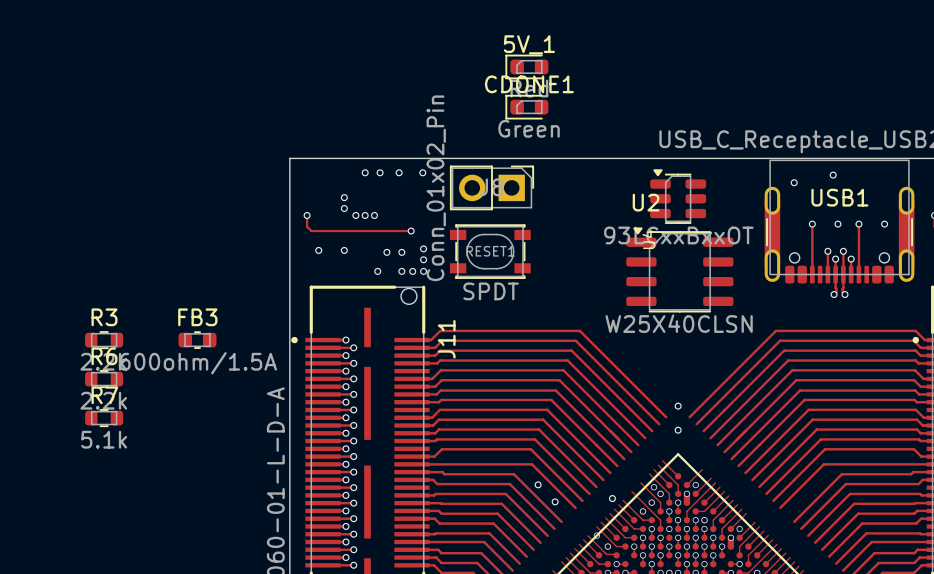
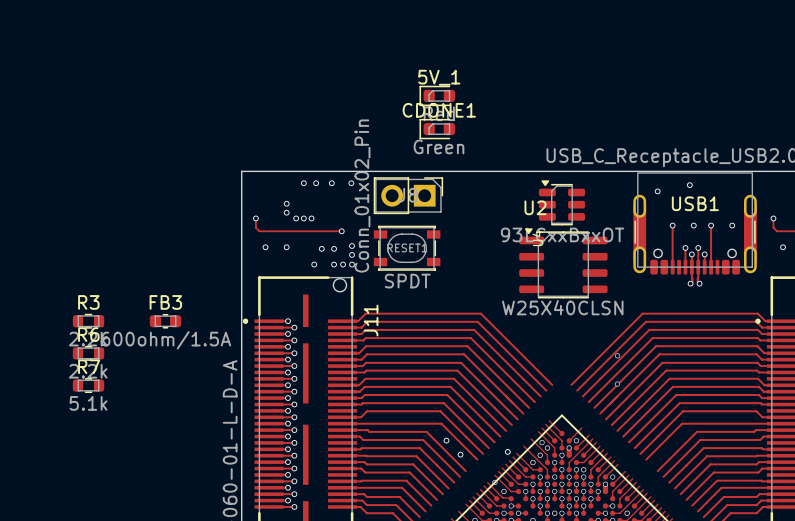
via: none -> (617, 355)
via: (678, 406) -> none
via: none -> (617, 384)
via: (678, 430) -> none

